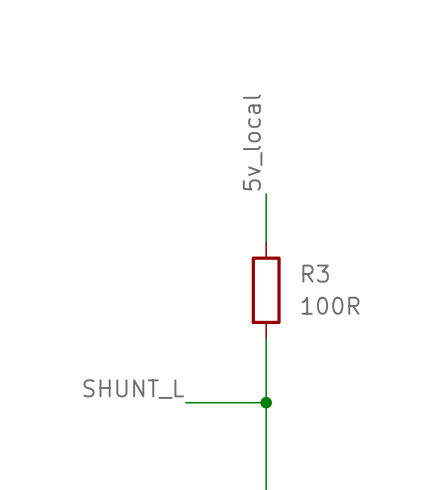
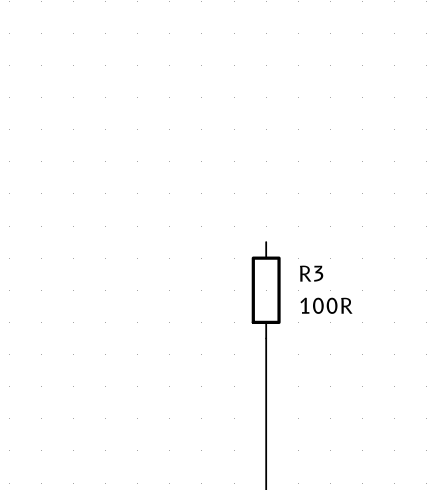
label: 5v_local (252, 142) -> none
wire: (266, 193) (266, 242) -> none
label: SHUNT_L (133, 389) -> none
wire: (185, 402) (266, 402) -> none
junction: (266, 402) -> none

